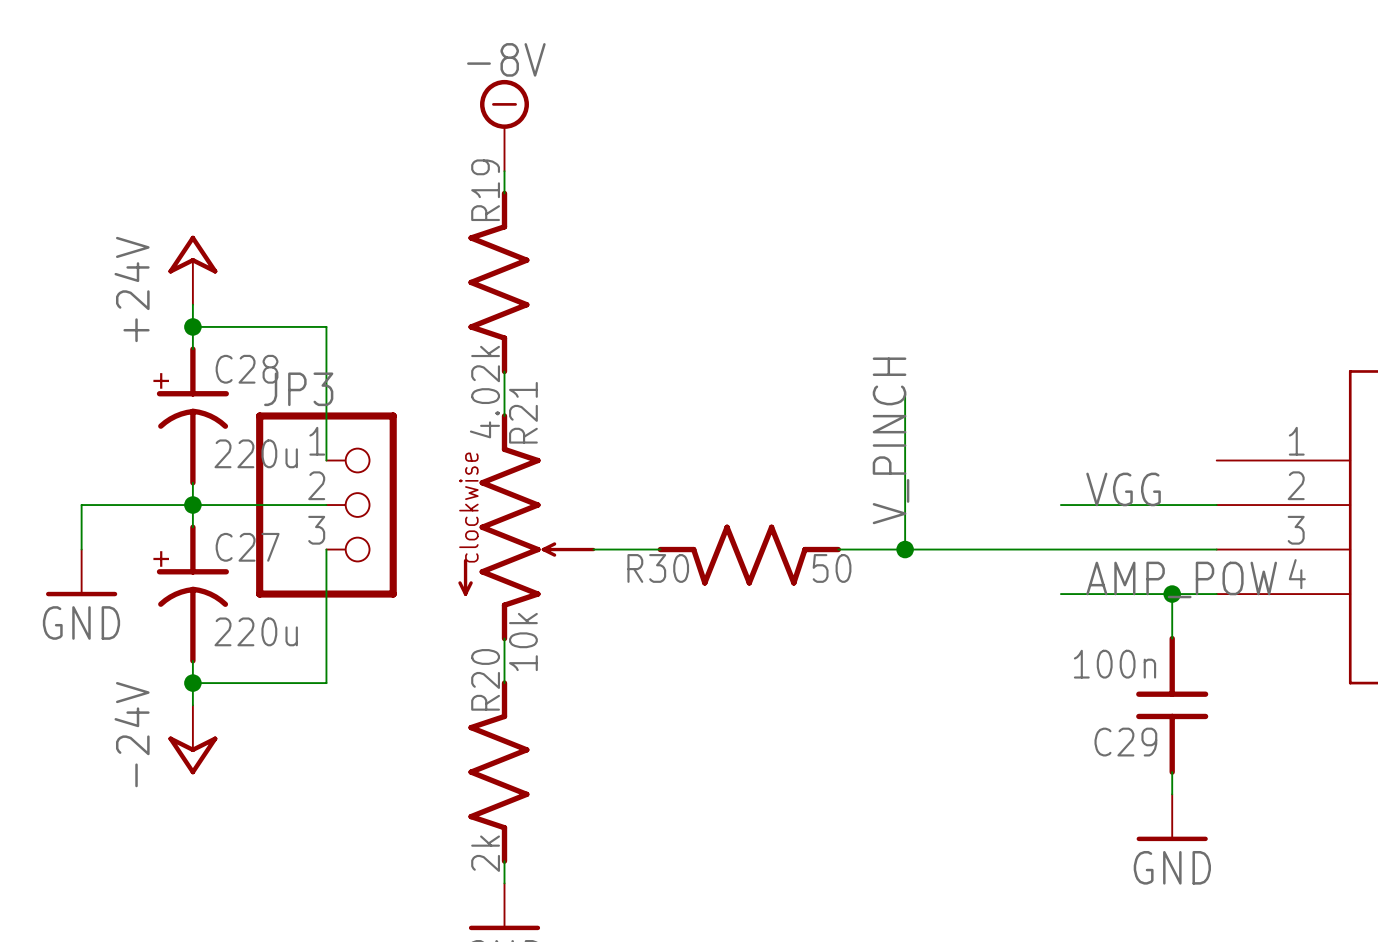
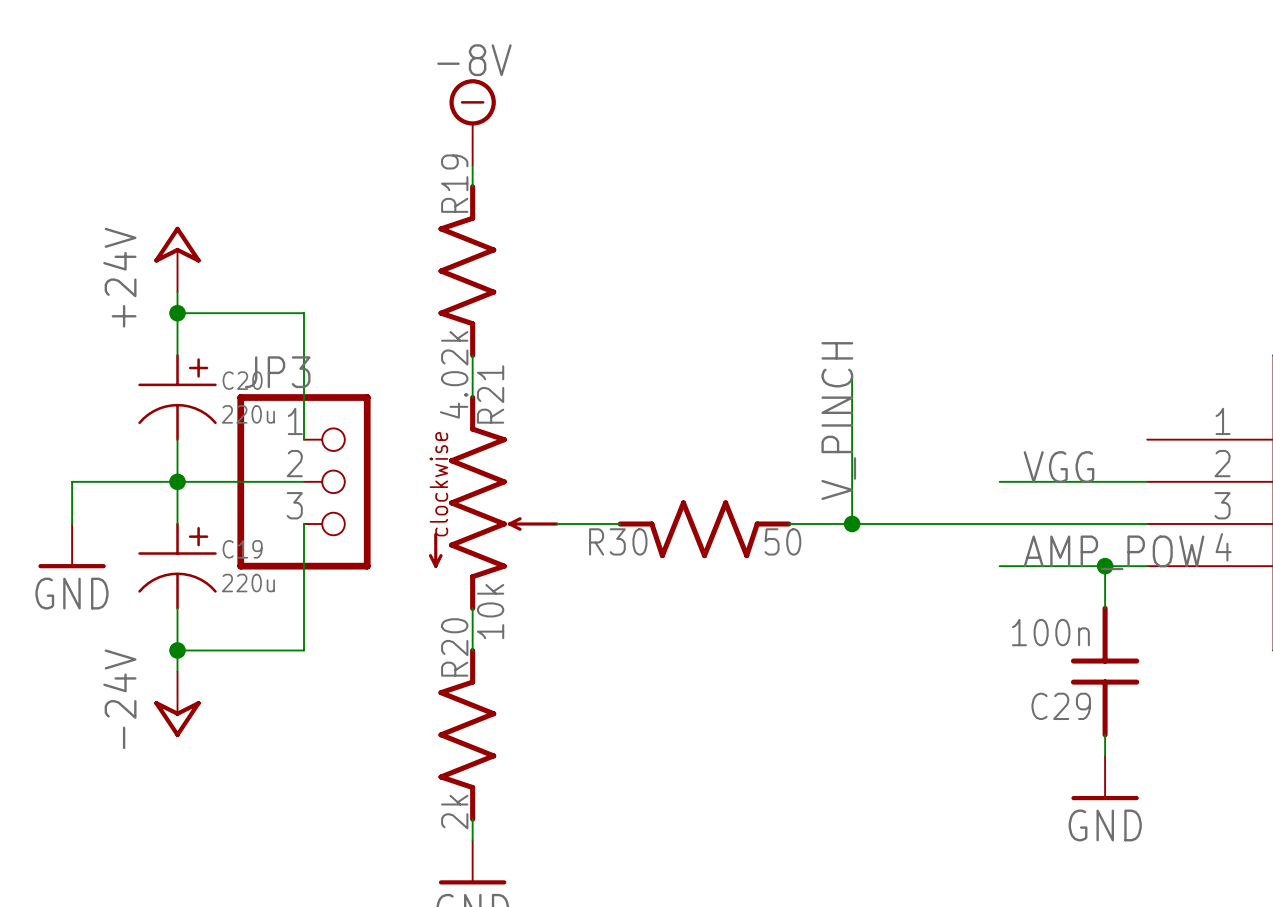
C28: 220u (191, 415) -> none
C20: none -> 220u (177, 397)
C27: 220u (191, 594) -> none
C19: none -> 220u (177, 566)

